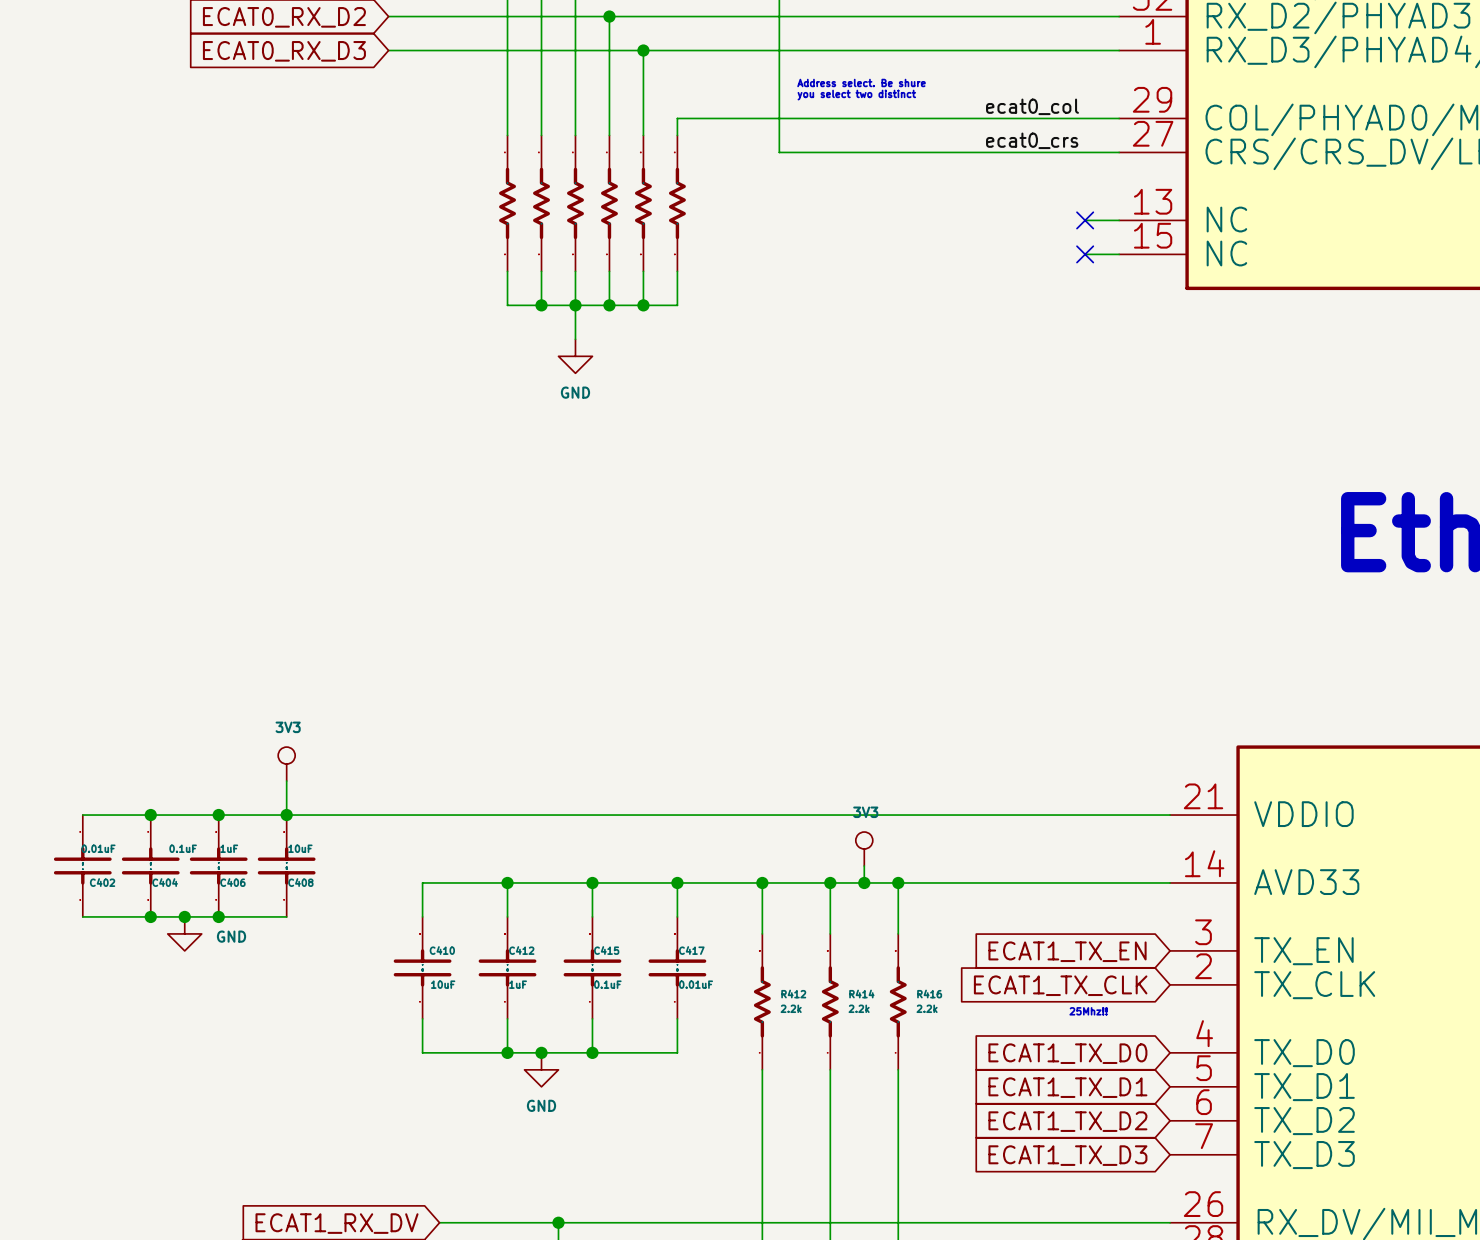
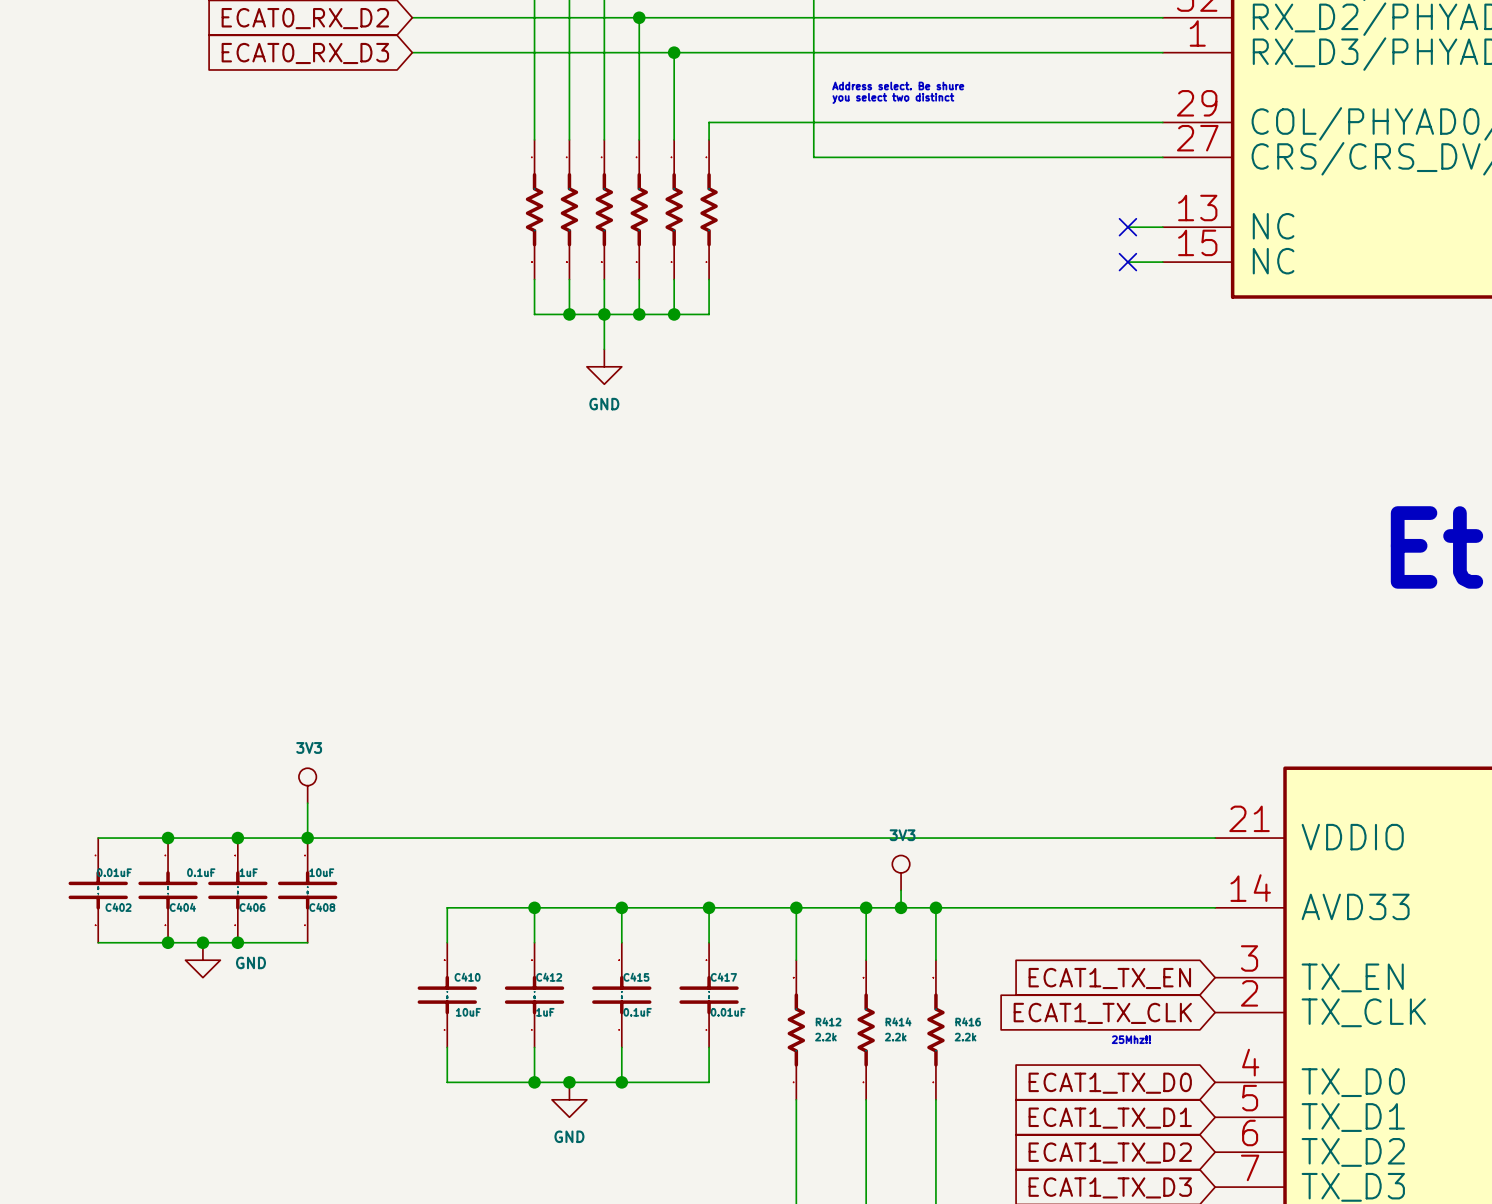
label: ecat0_col (1032, 106) -> none
label: ecat0_crs (1032, 140) -> none

